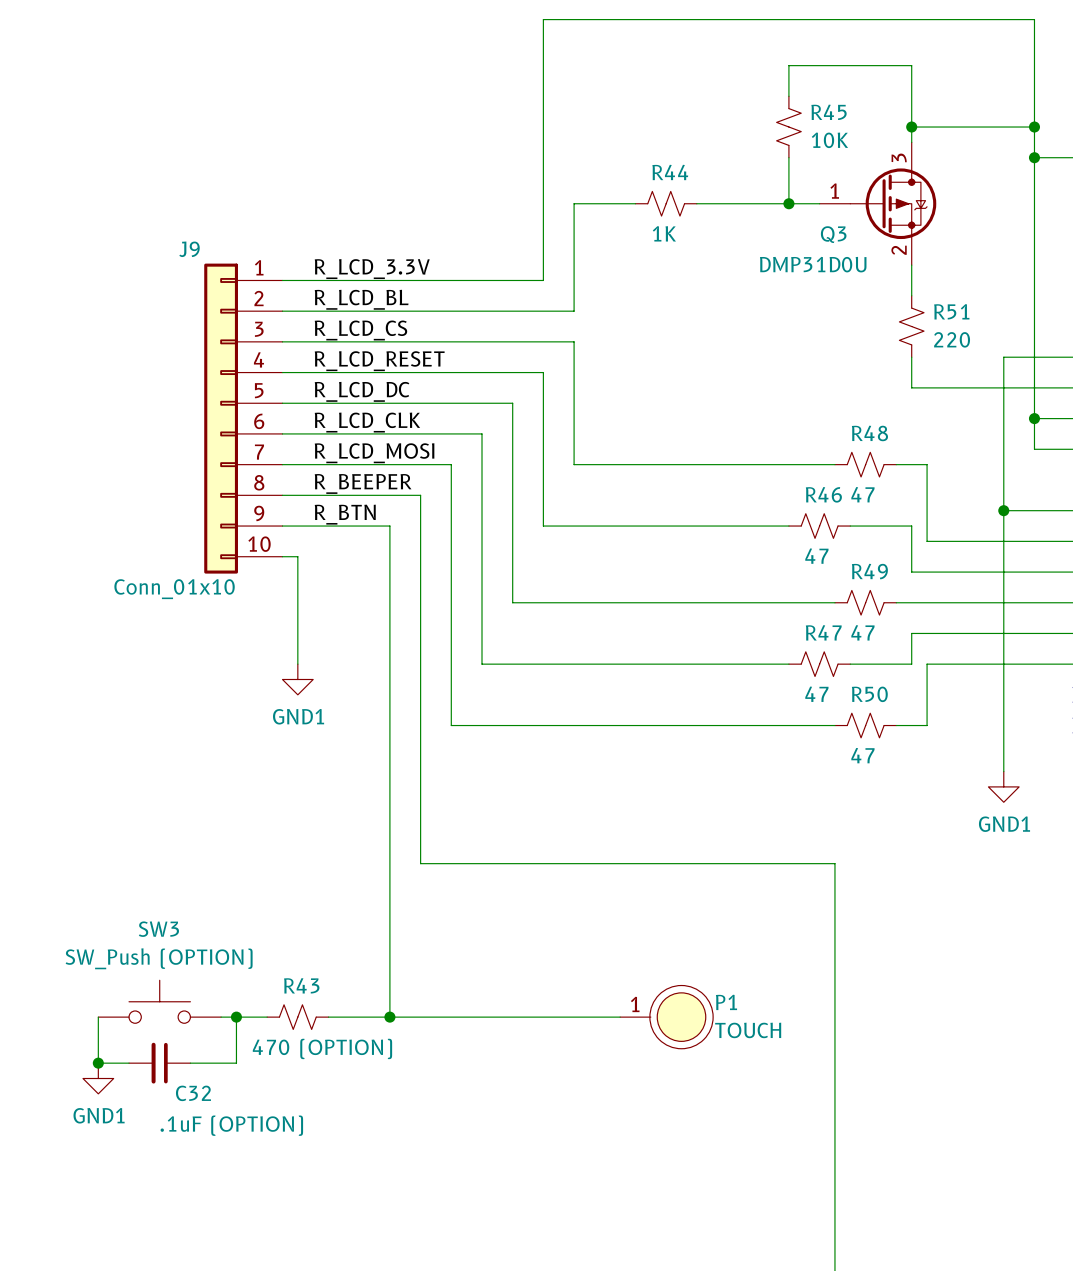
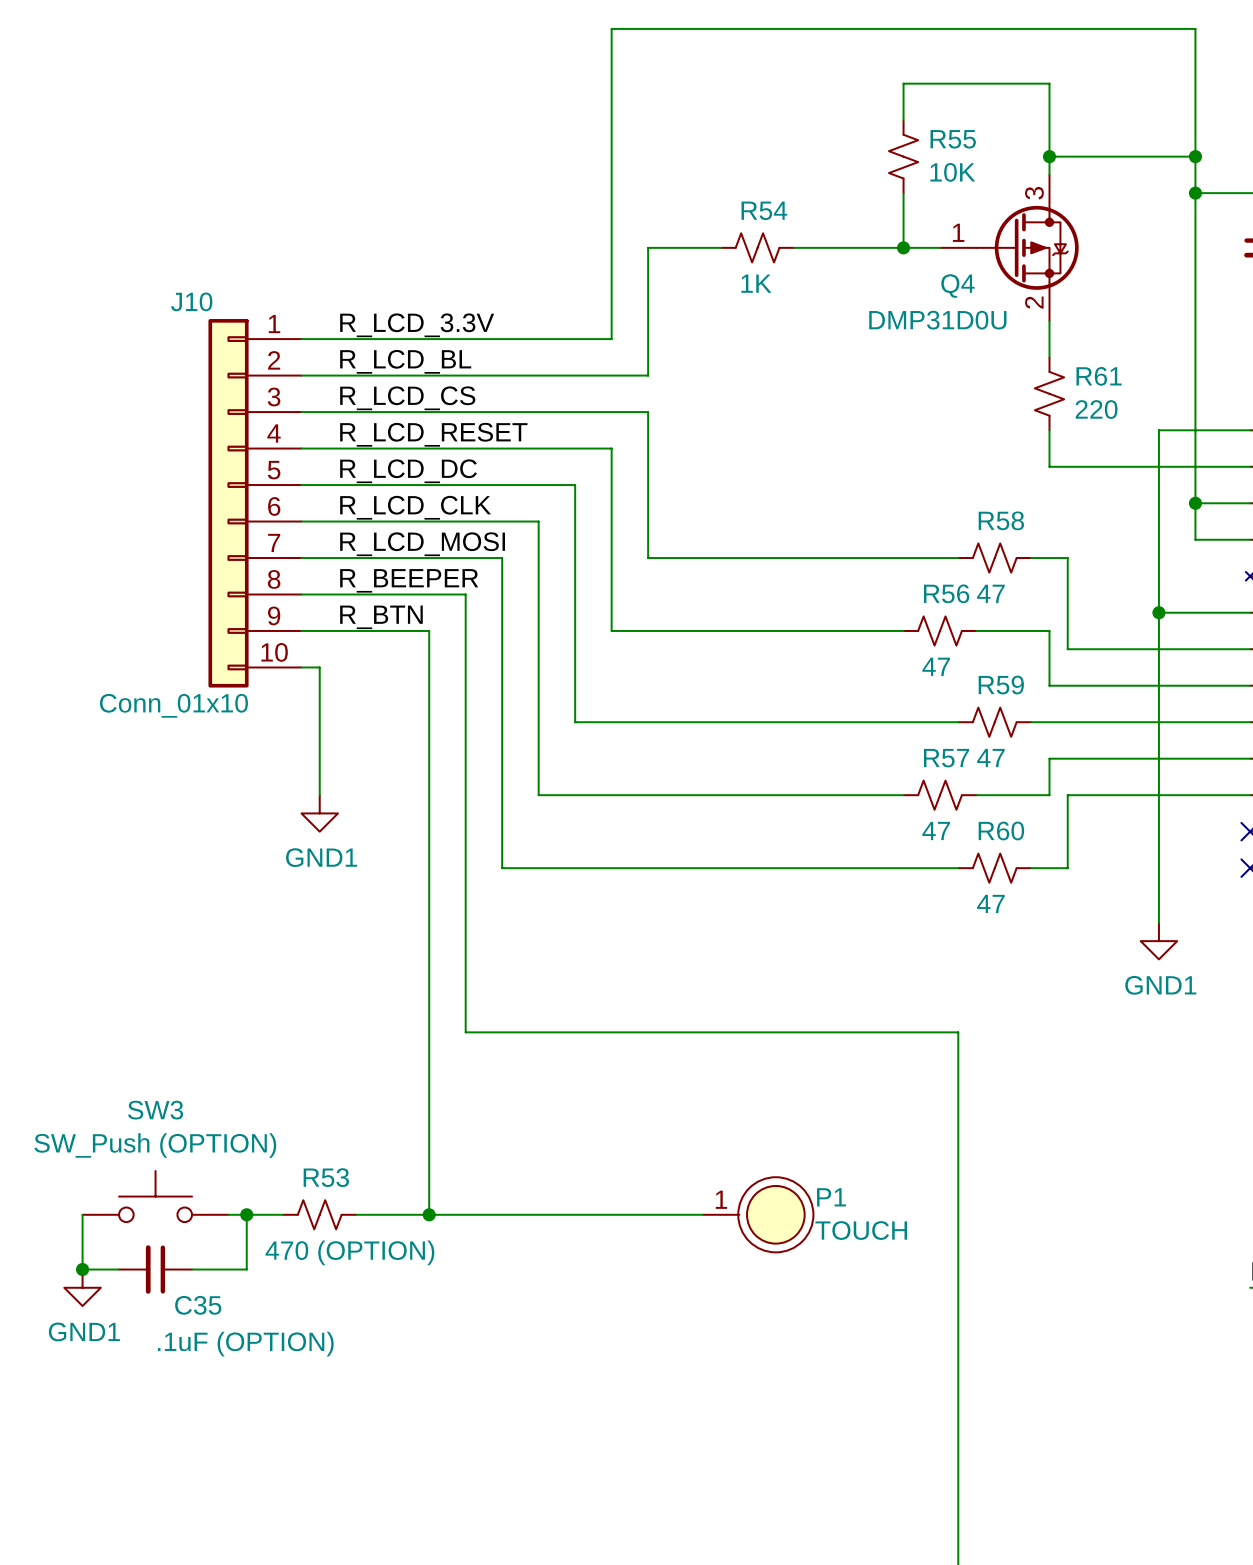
R45 name: R45 (829, 112) -> R55 (953, 139)
R44 name: R44 (670, 172) -> R54 (764, 210)
Q3 name: Q3 (833, 234) -> Q4 (957, 286)
J9 name: J9 (189, 249) -> J10 (191, 301)
R51 name: R51 (951, 311) -> R61 (1099, 376)
R48 name: R48 (869, 433) -> R58 (1001, 520)
R46 name: R46 (823, 494) -> R56 (946, 593)
R49 name: R49 (869, 571) -> R59 (1001, 685)
R47 name: R47 (823, 632) -> R57 (946, 758)
R50 name: R50 (869, 694) -> R60 (1001, 830)
R43 name: R43 (301, 985) -> R53 (326, 1177)
C32 name: C32 (193, 1093) -> C35 (198, 1305)

